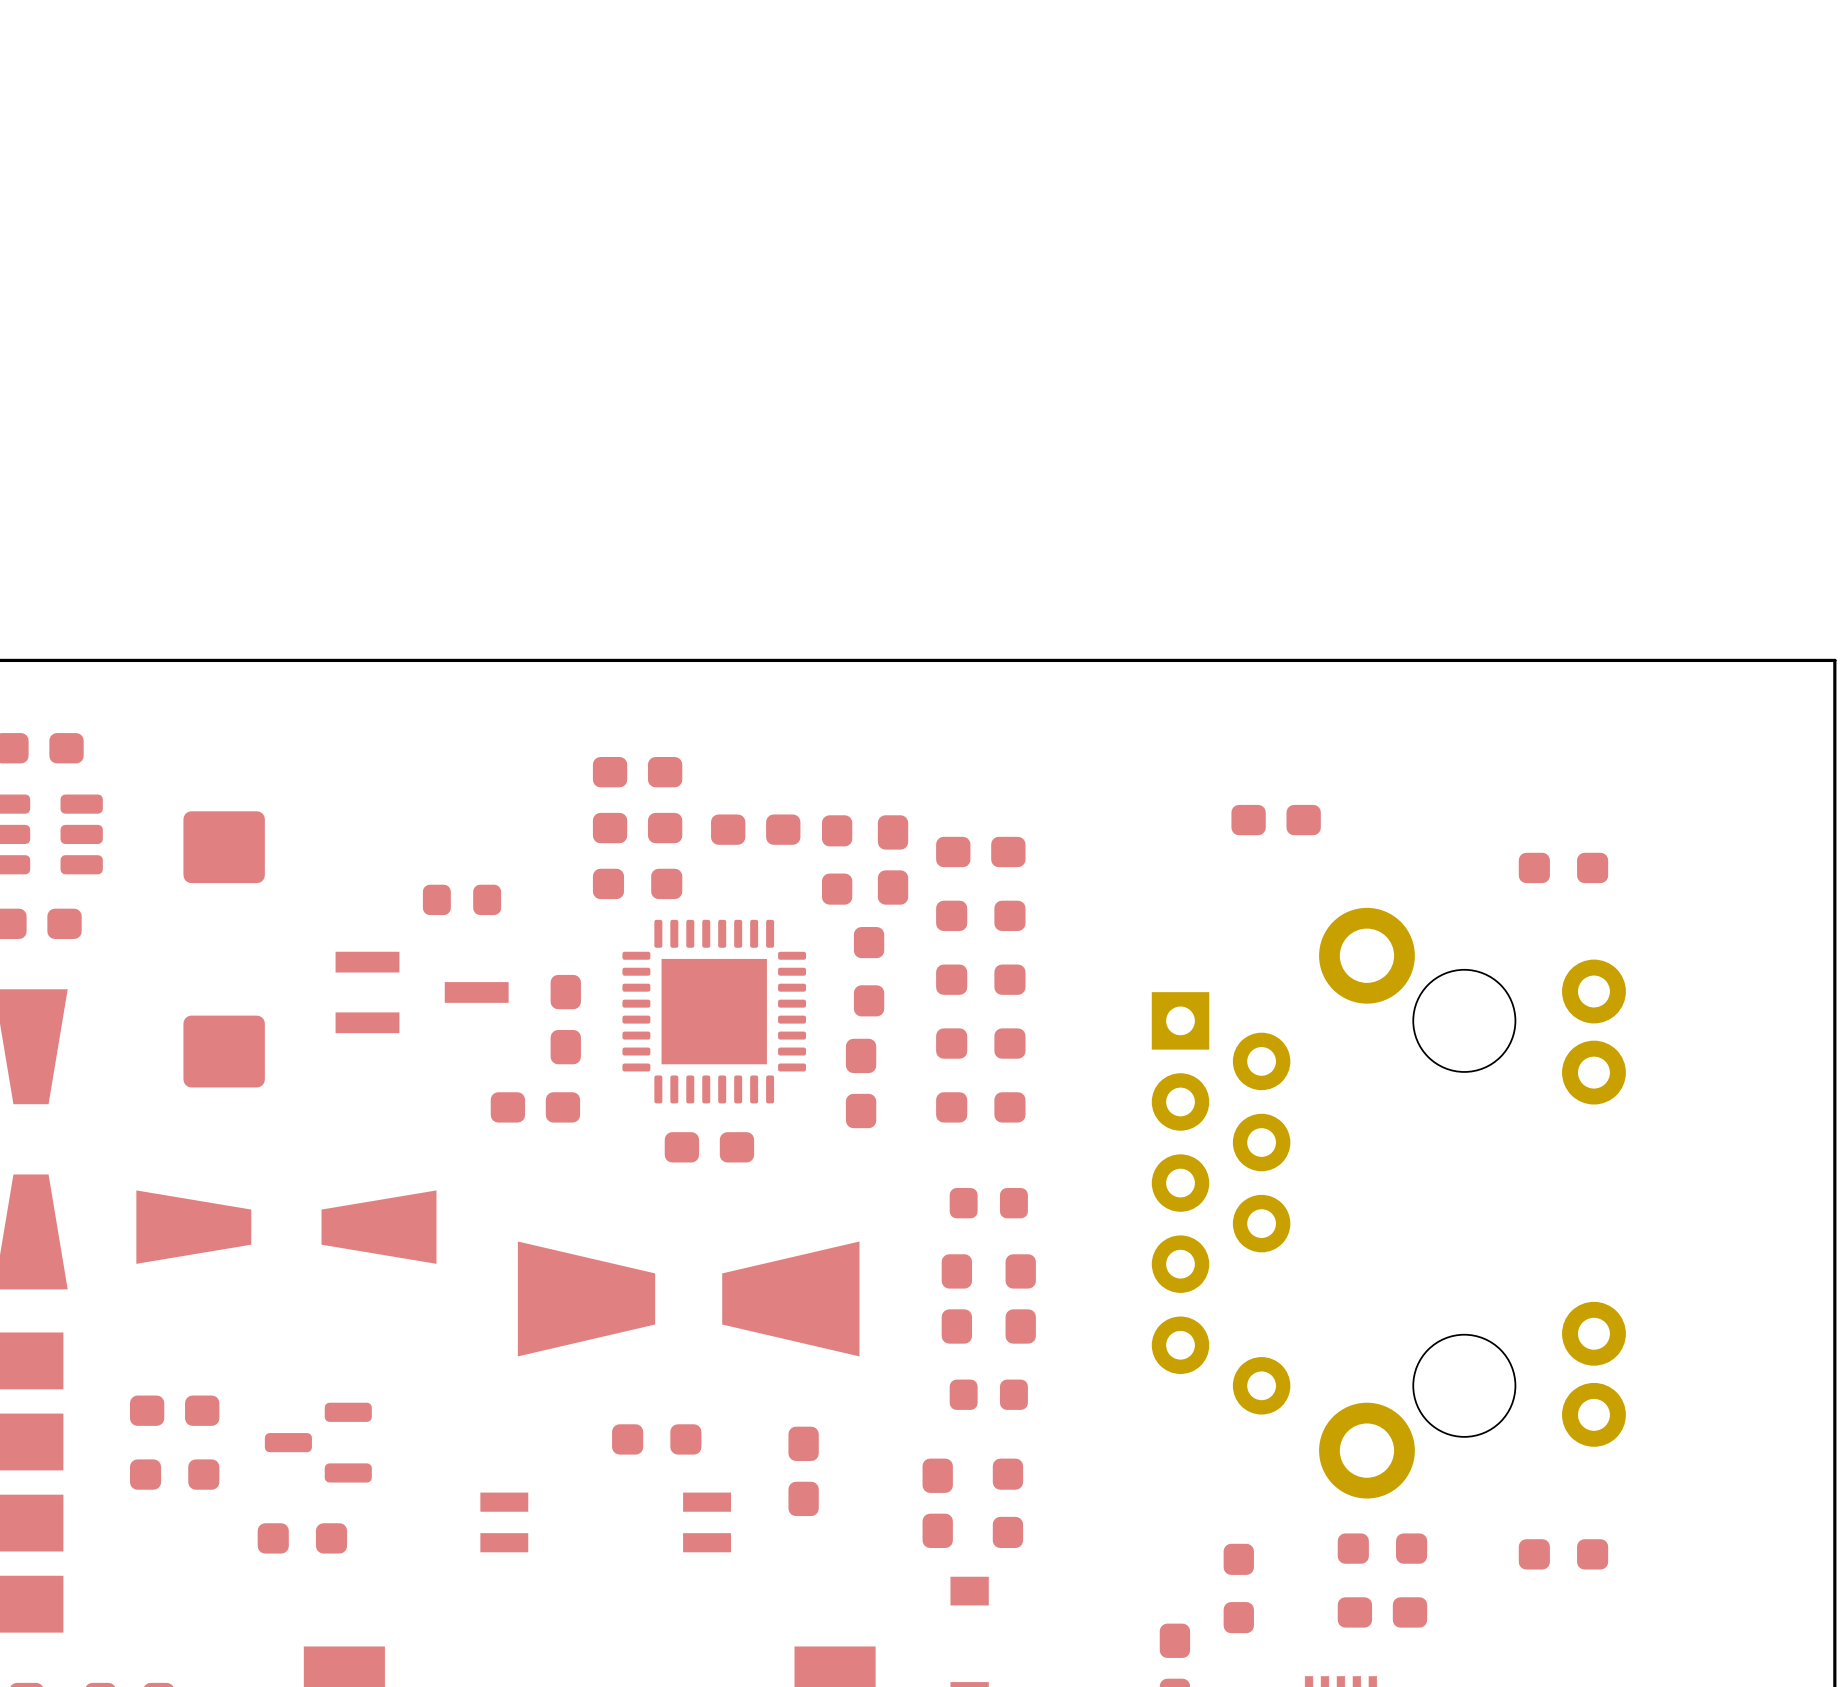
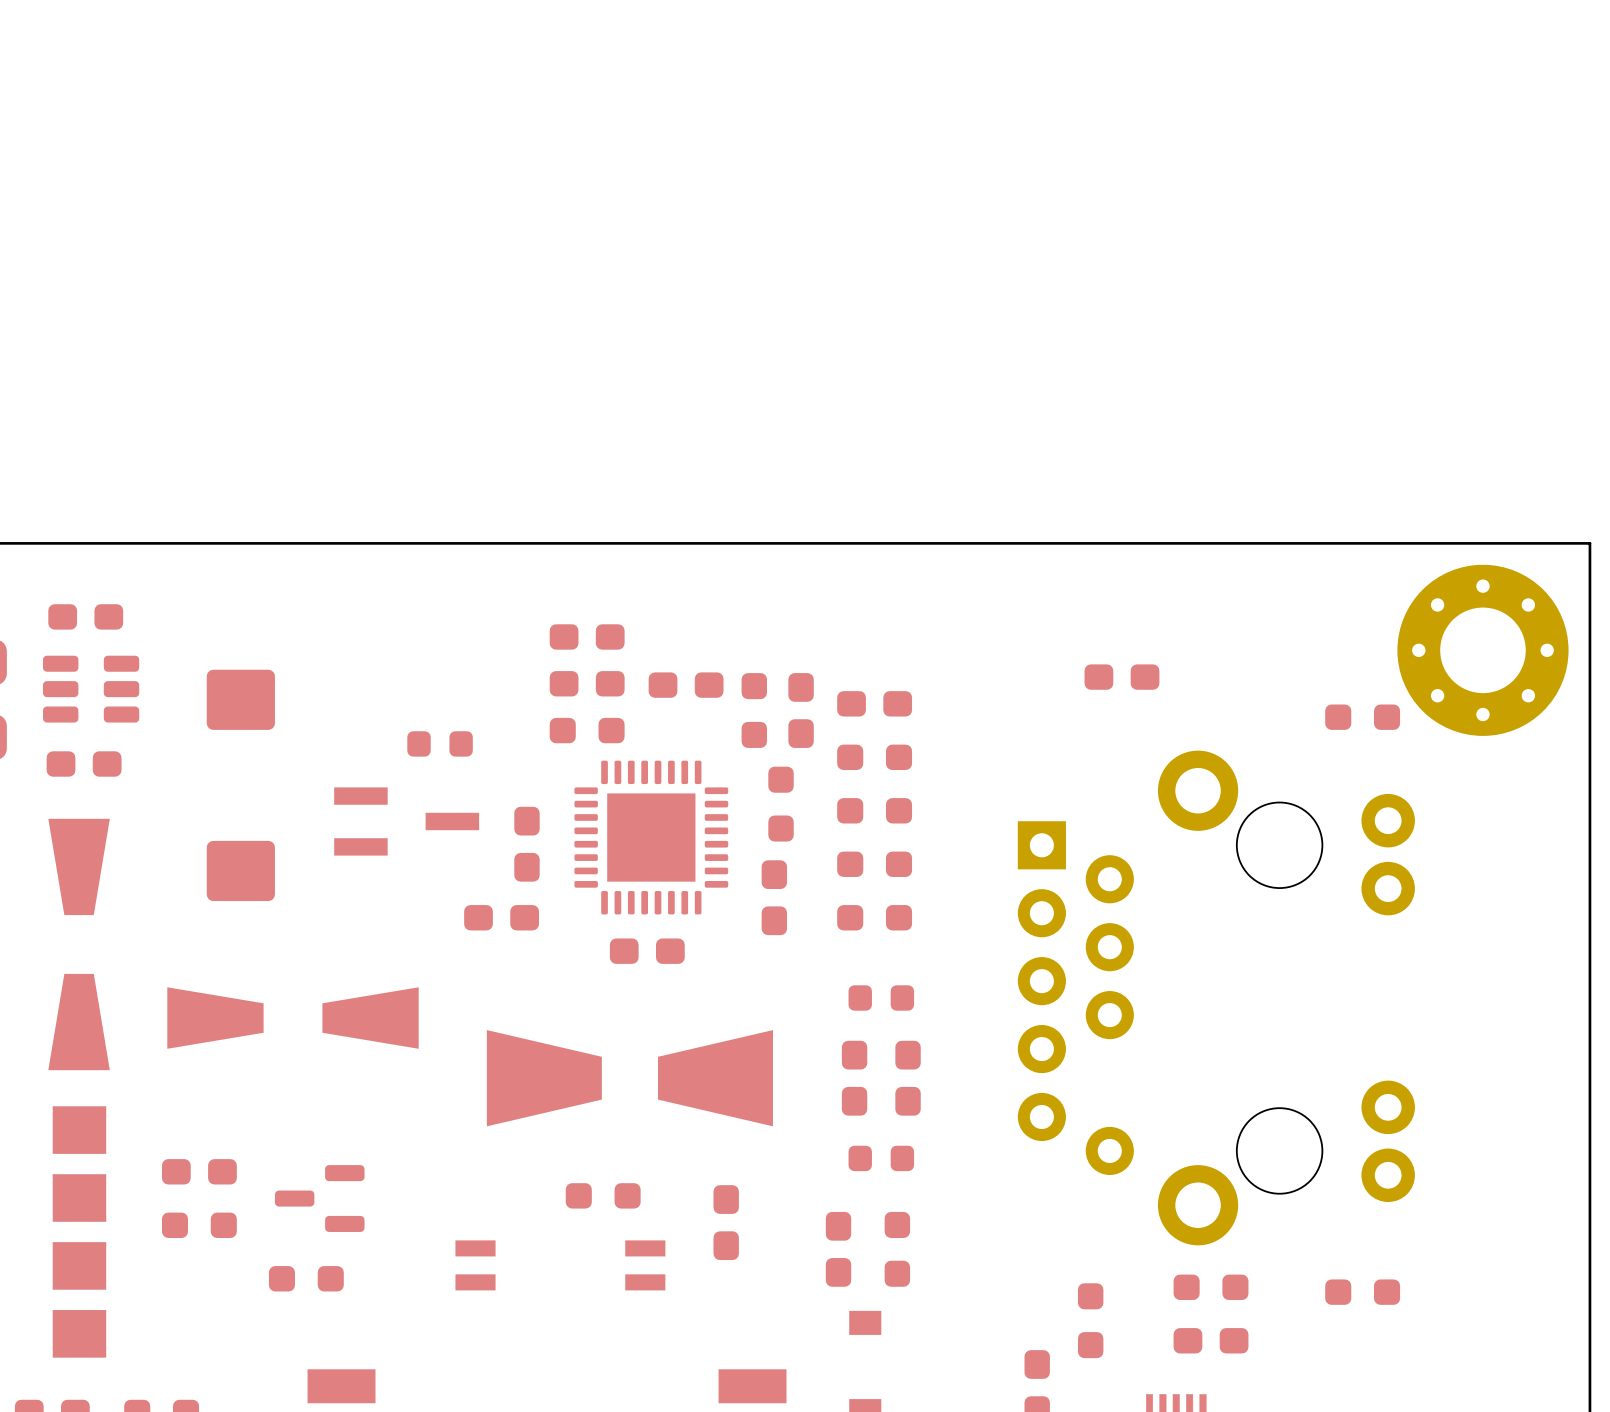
part: none -> (1482, 650)

